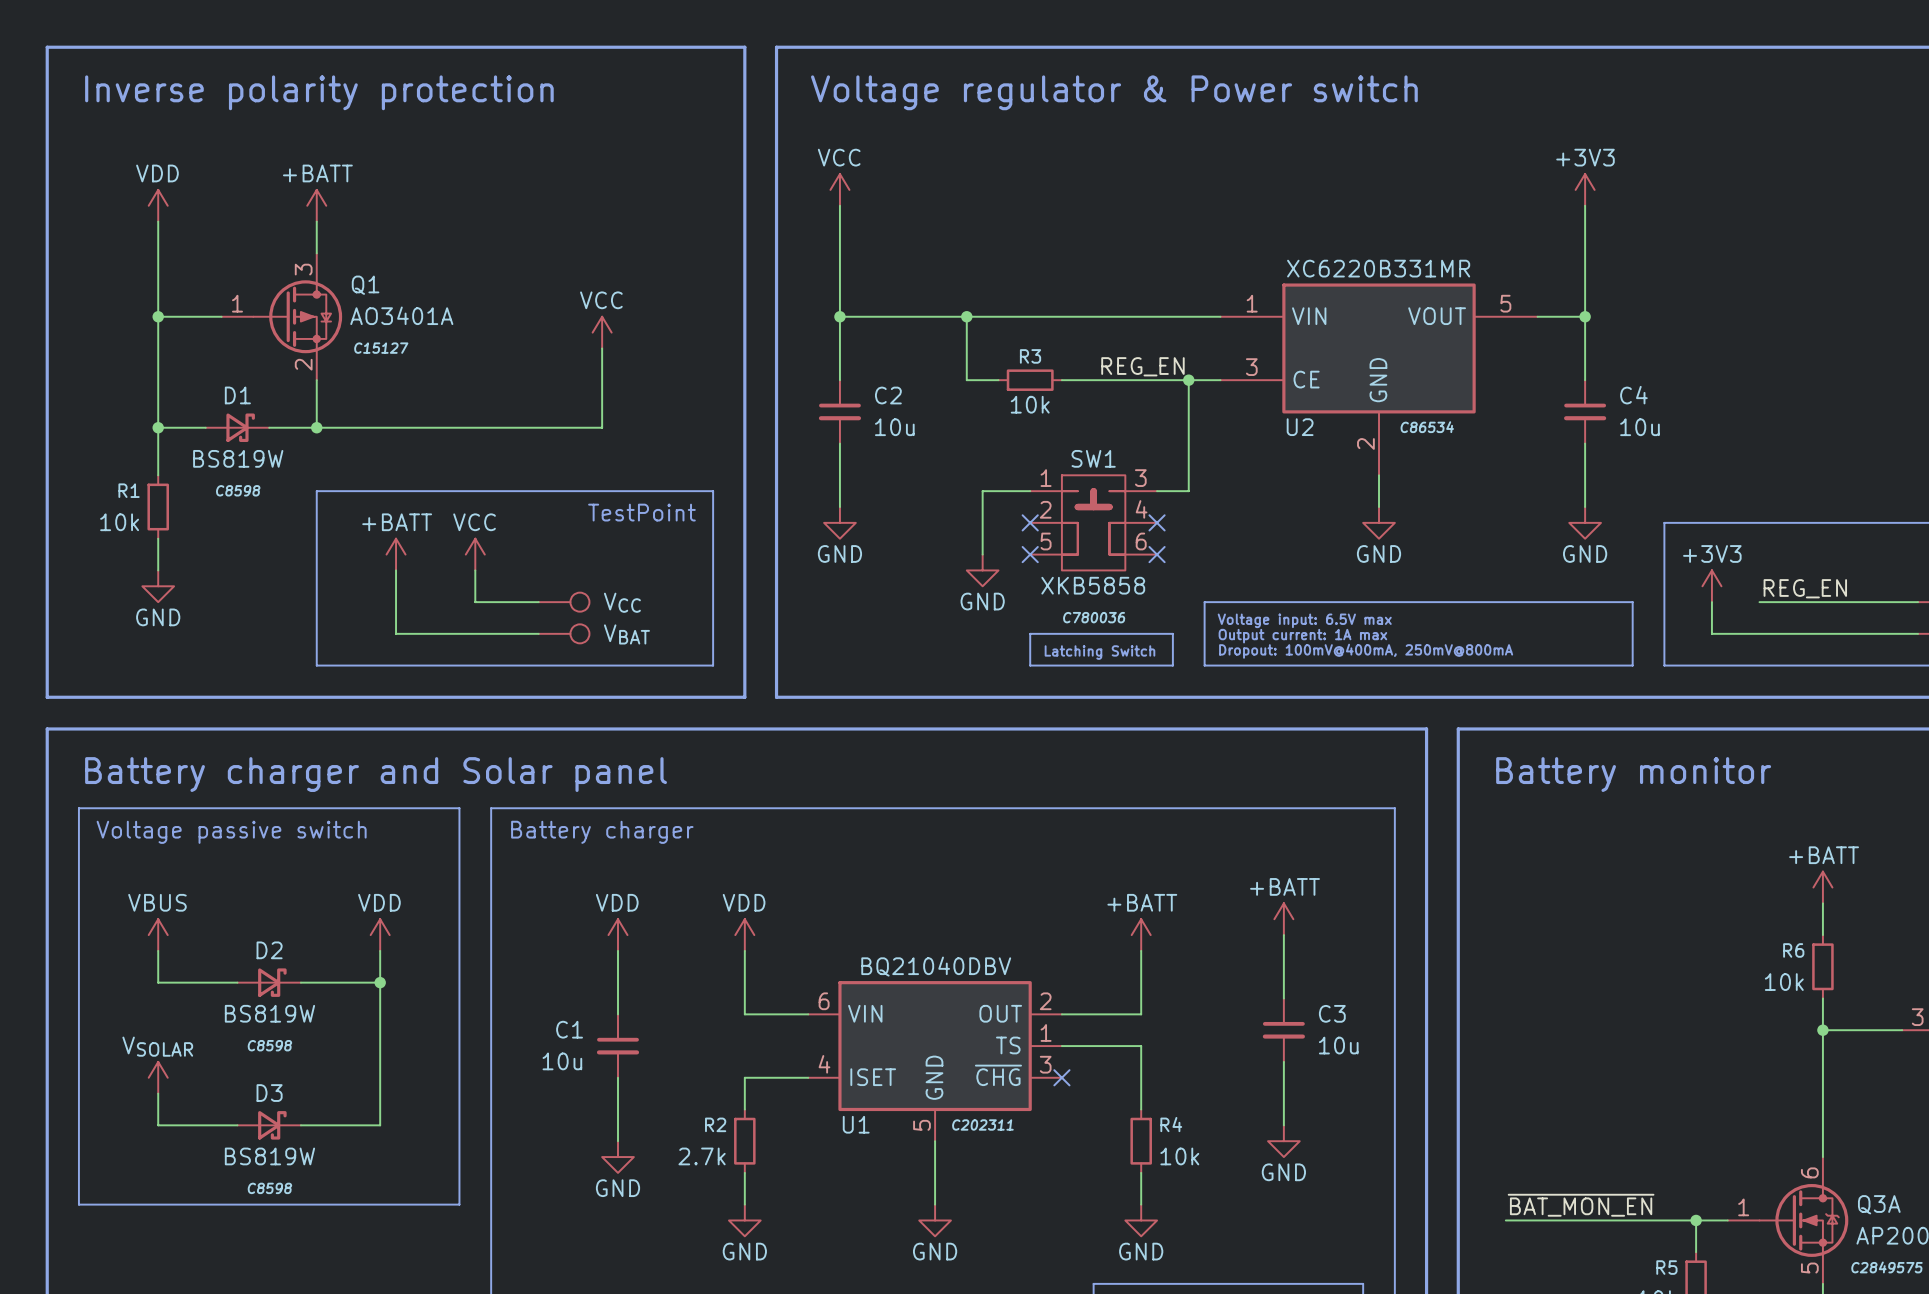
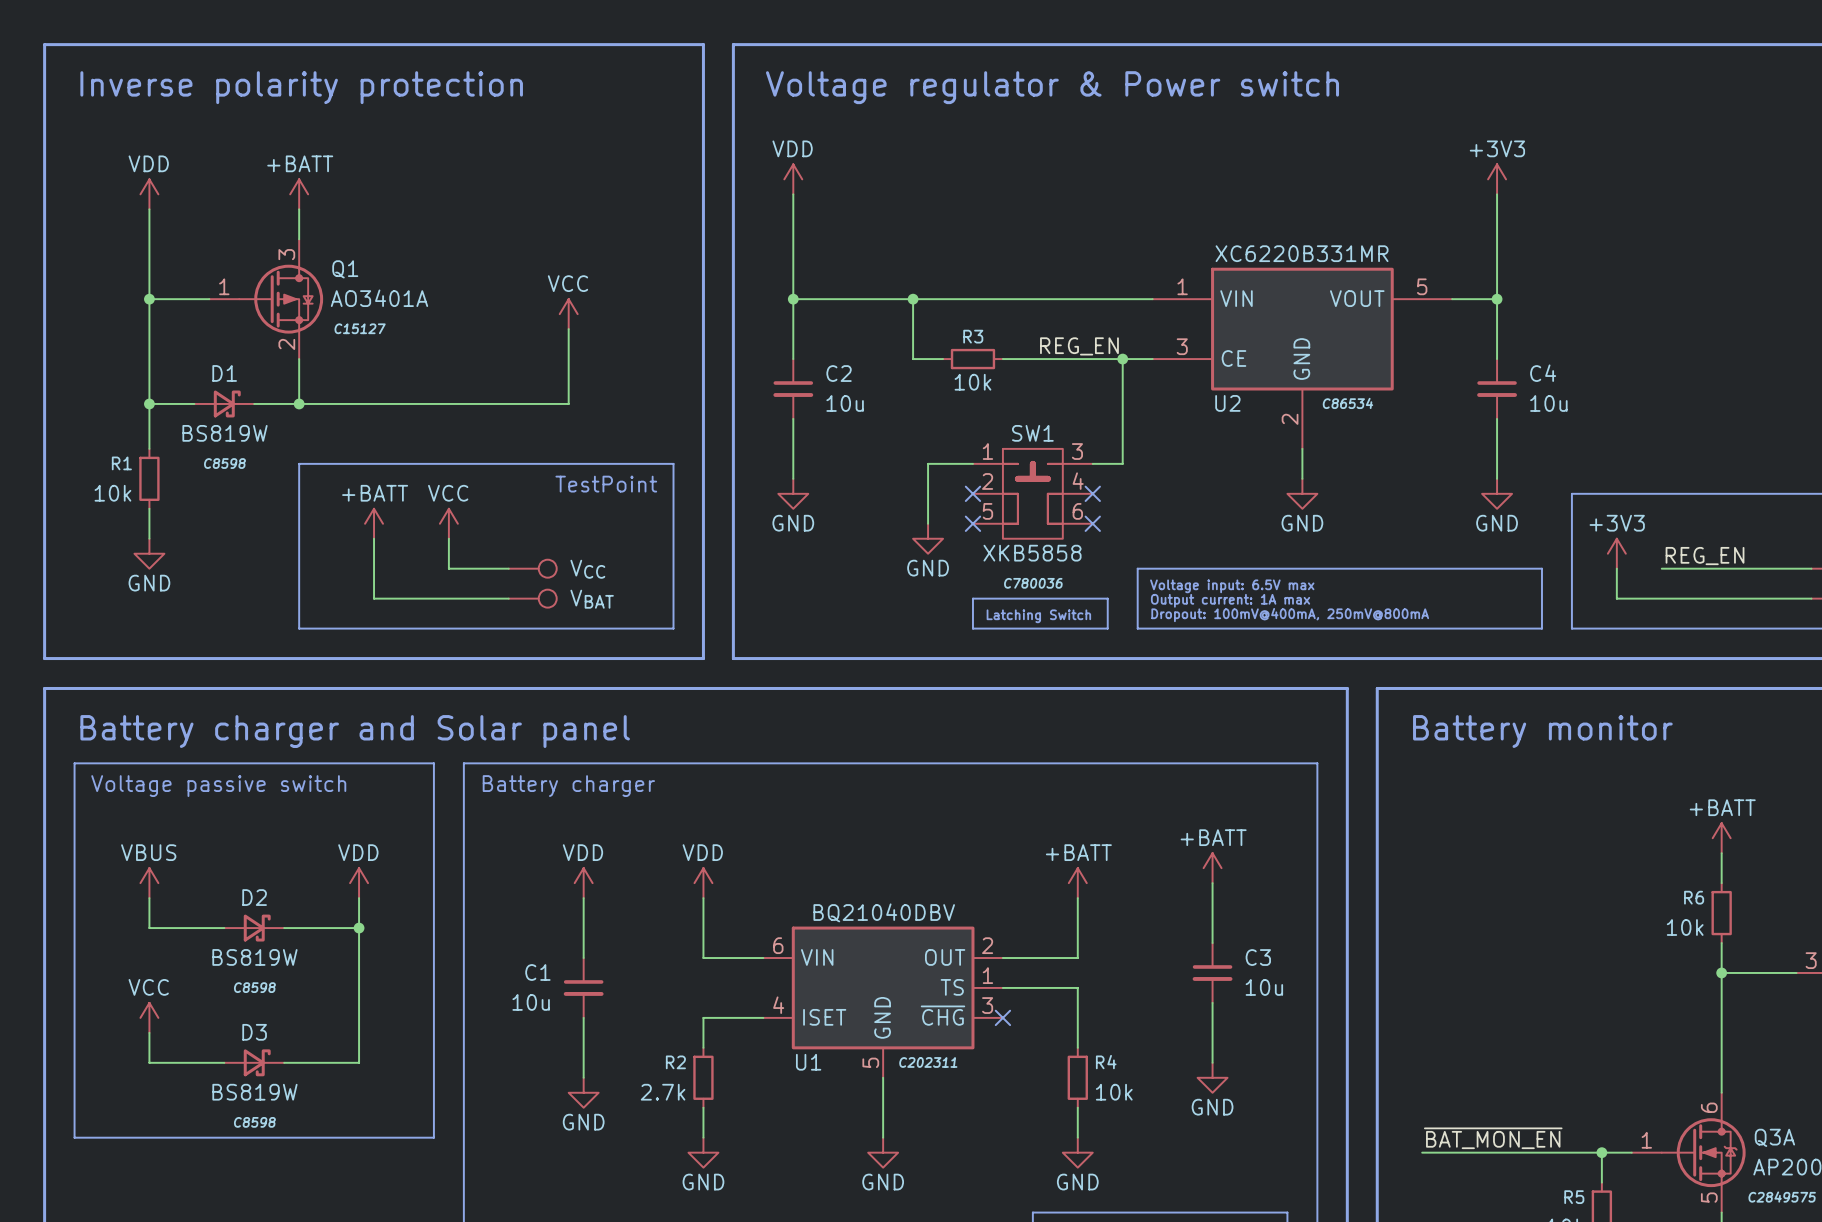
power symbol: VCC (839, 189) -> VDD (793, 179)
power symbol: VSOLAR (158, 1077) -> VCC (149, 1017)

